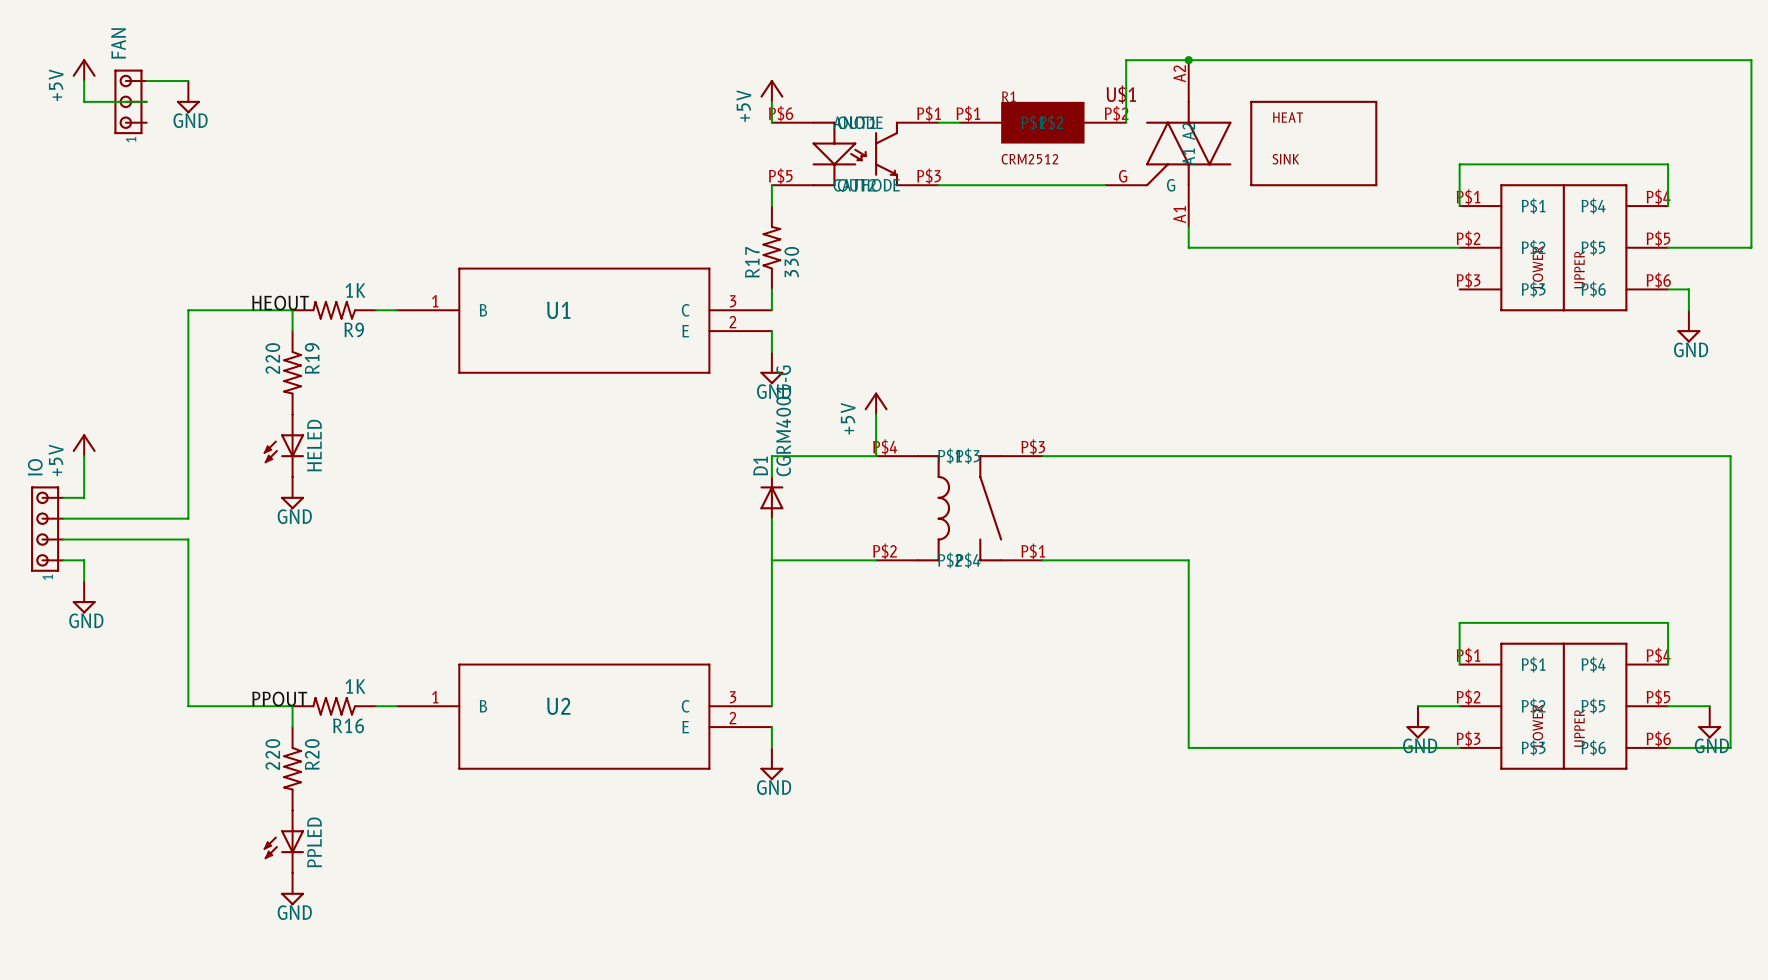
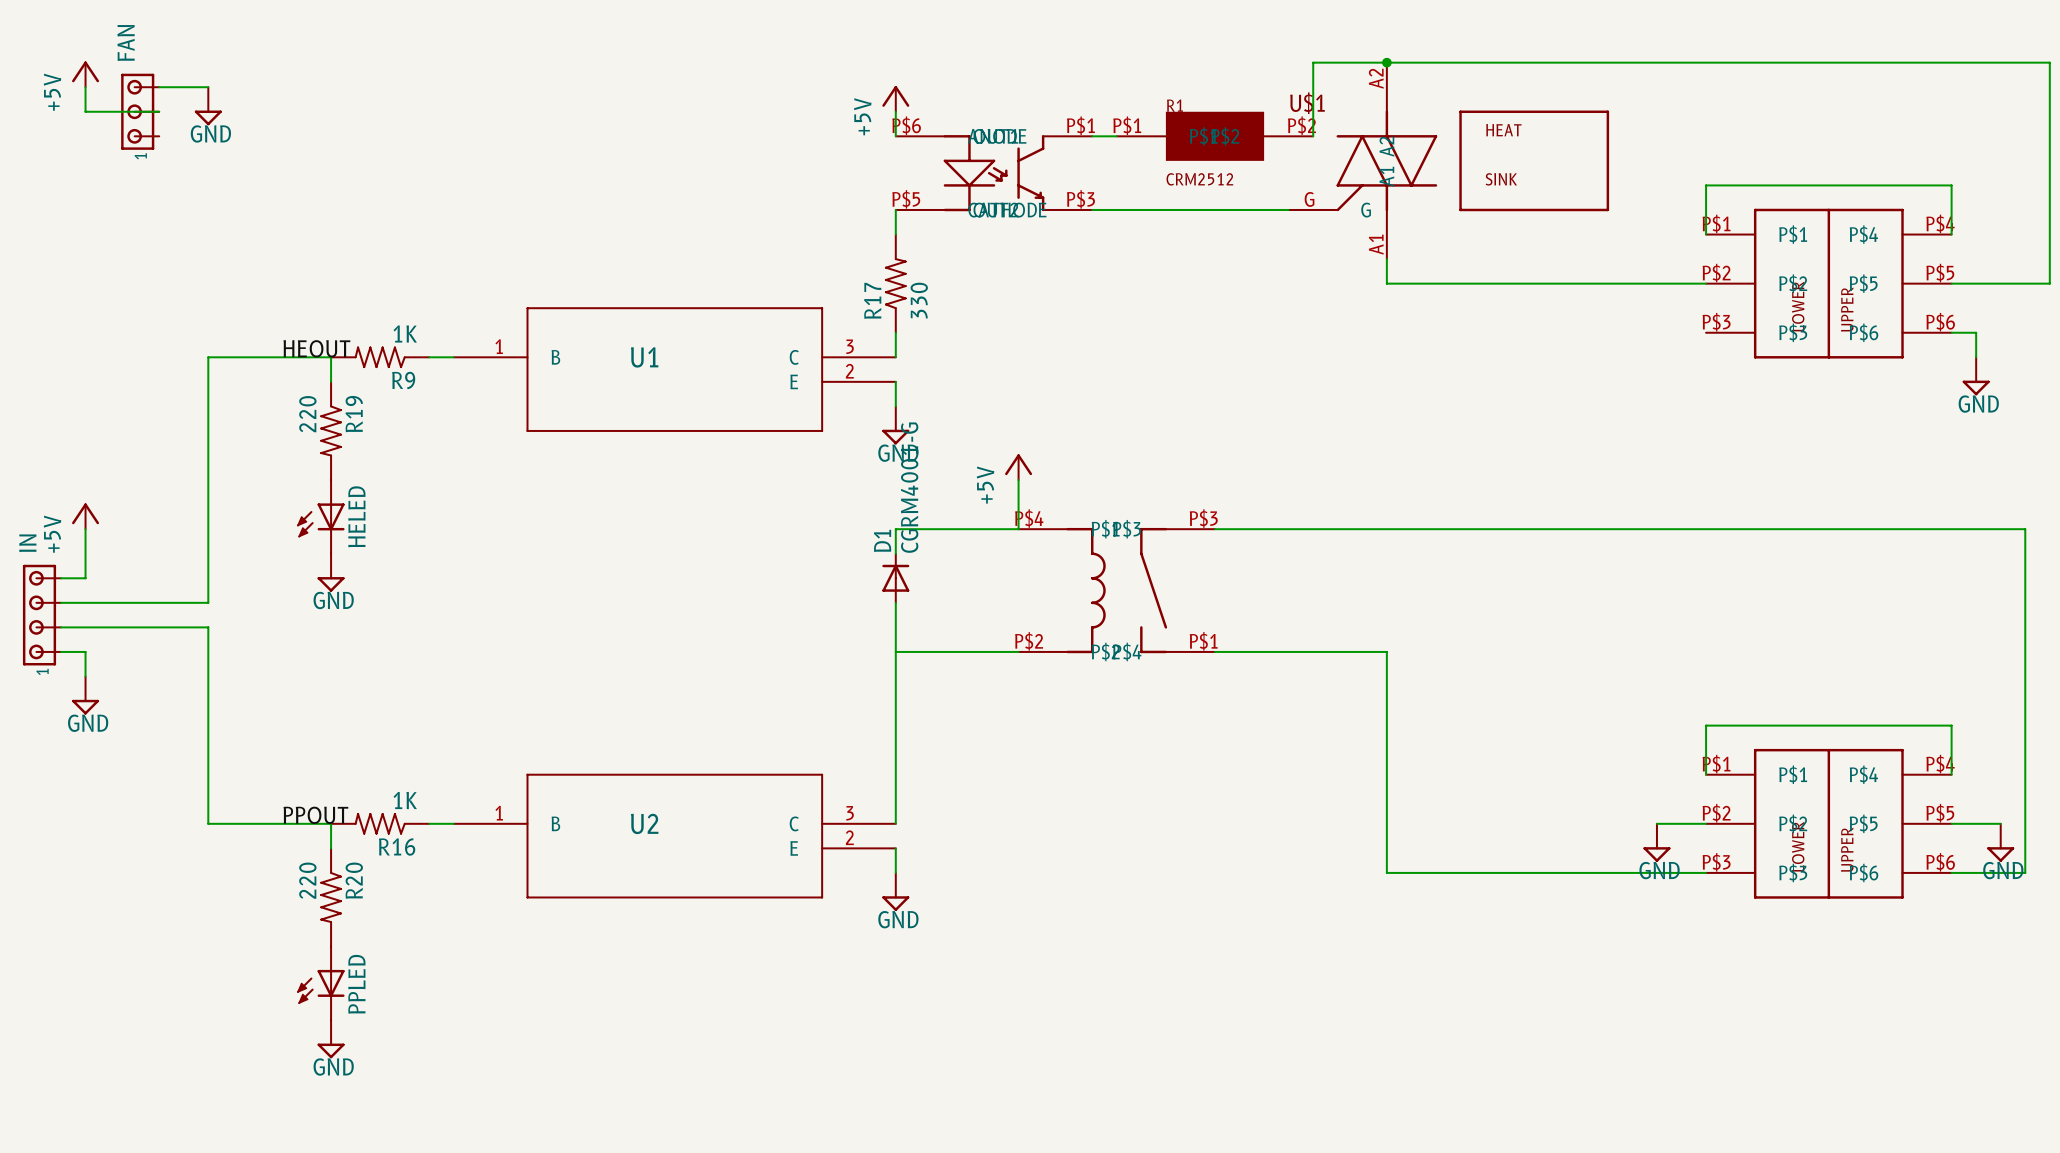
IO name: IO (35, 467) -> IN (27, 543)

